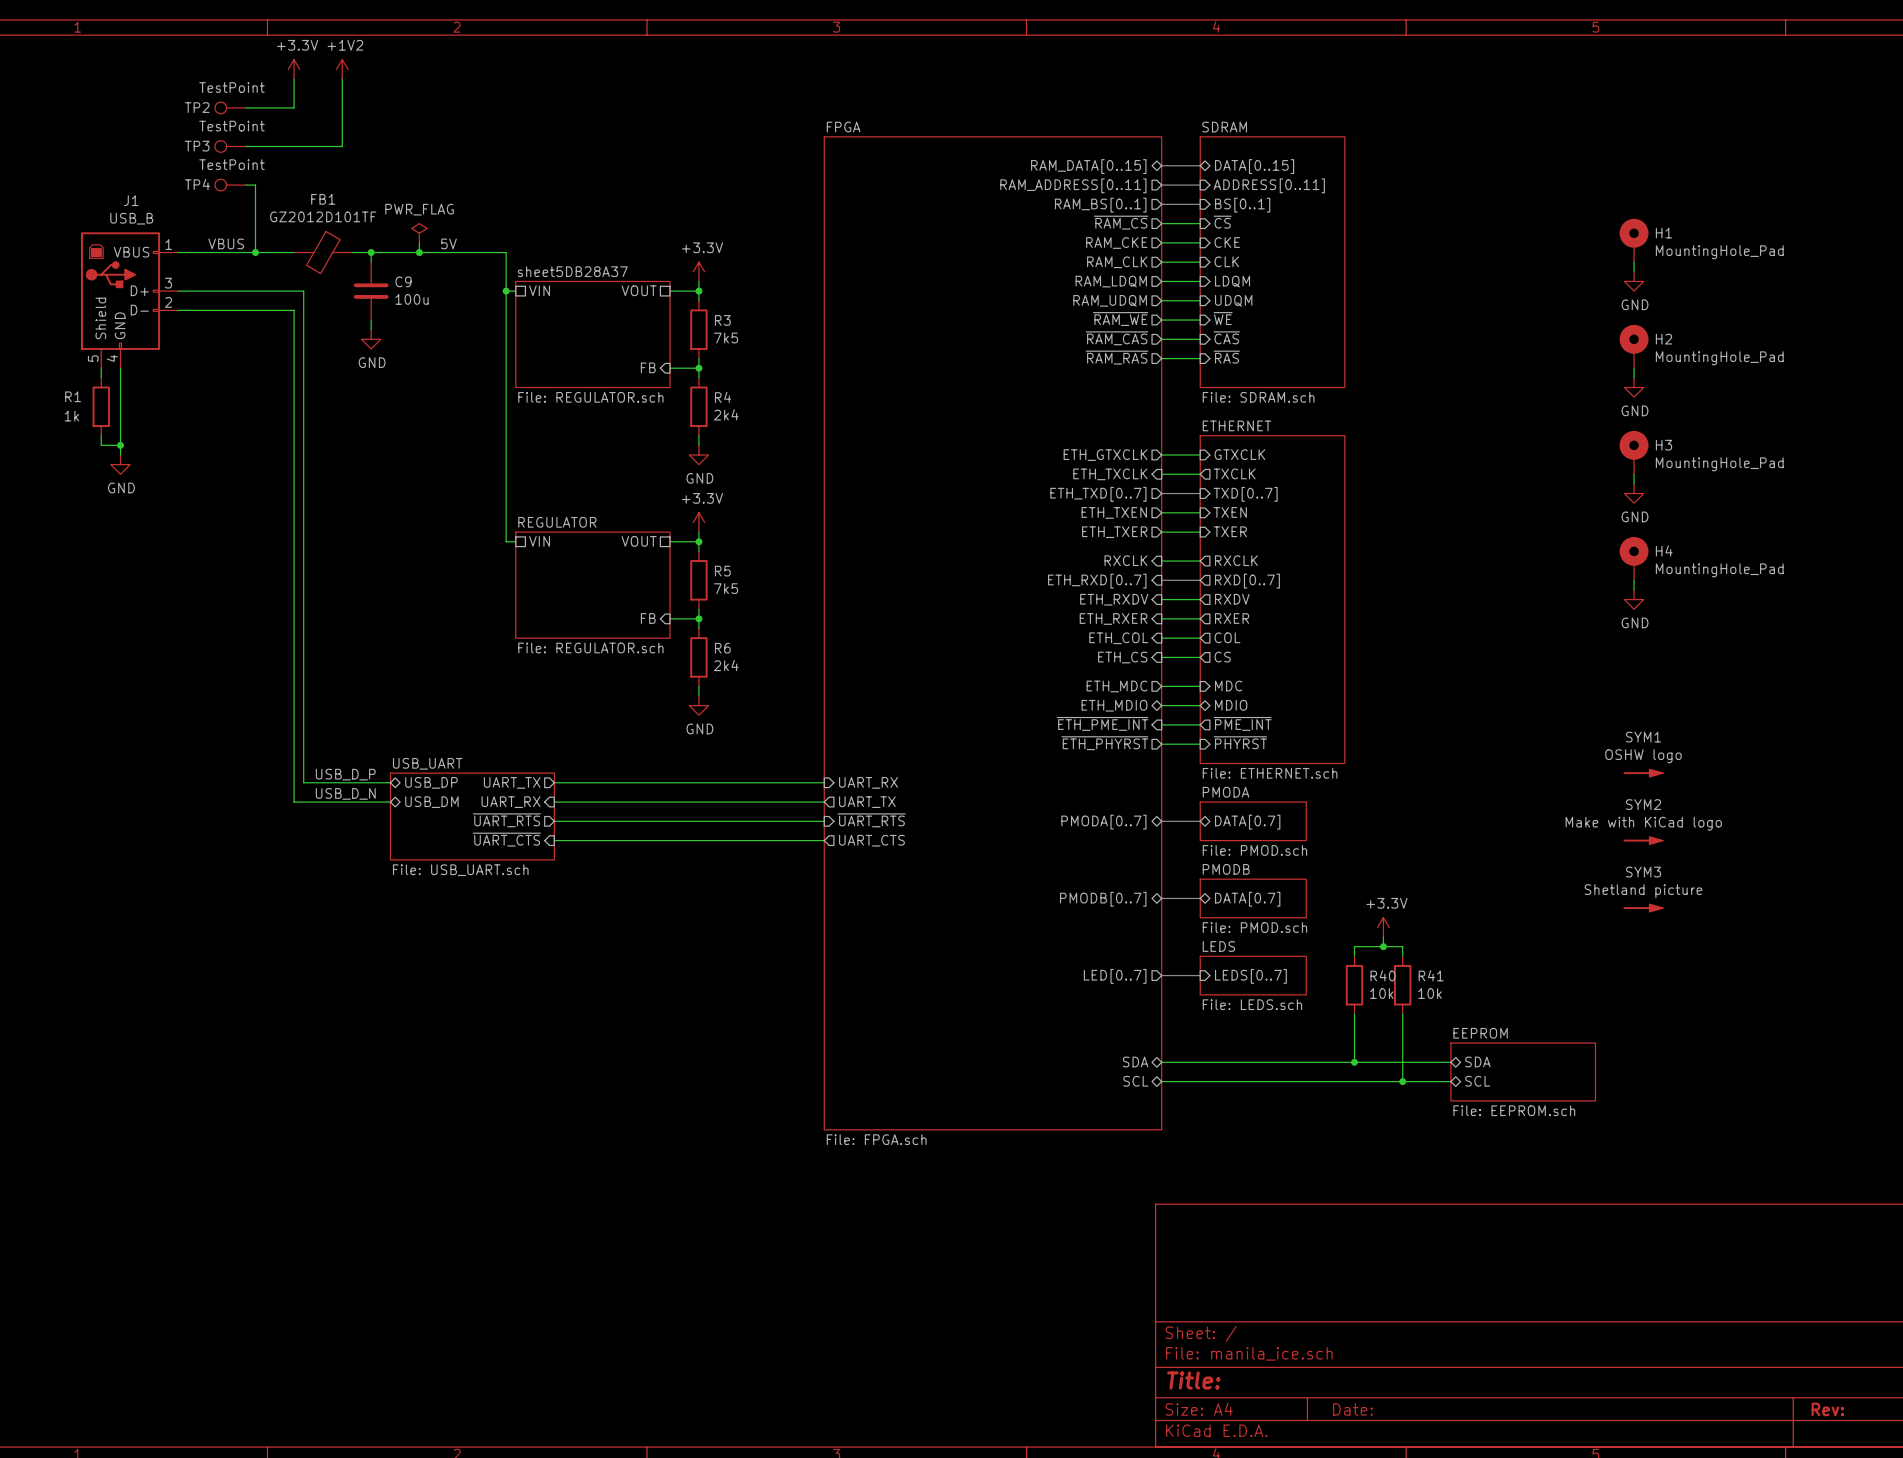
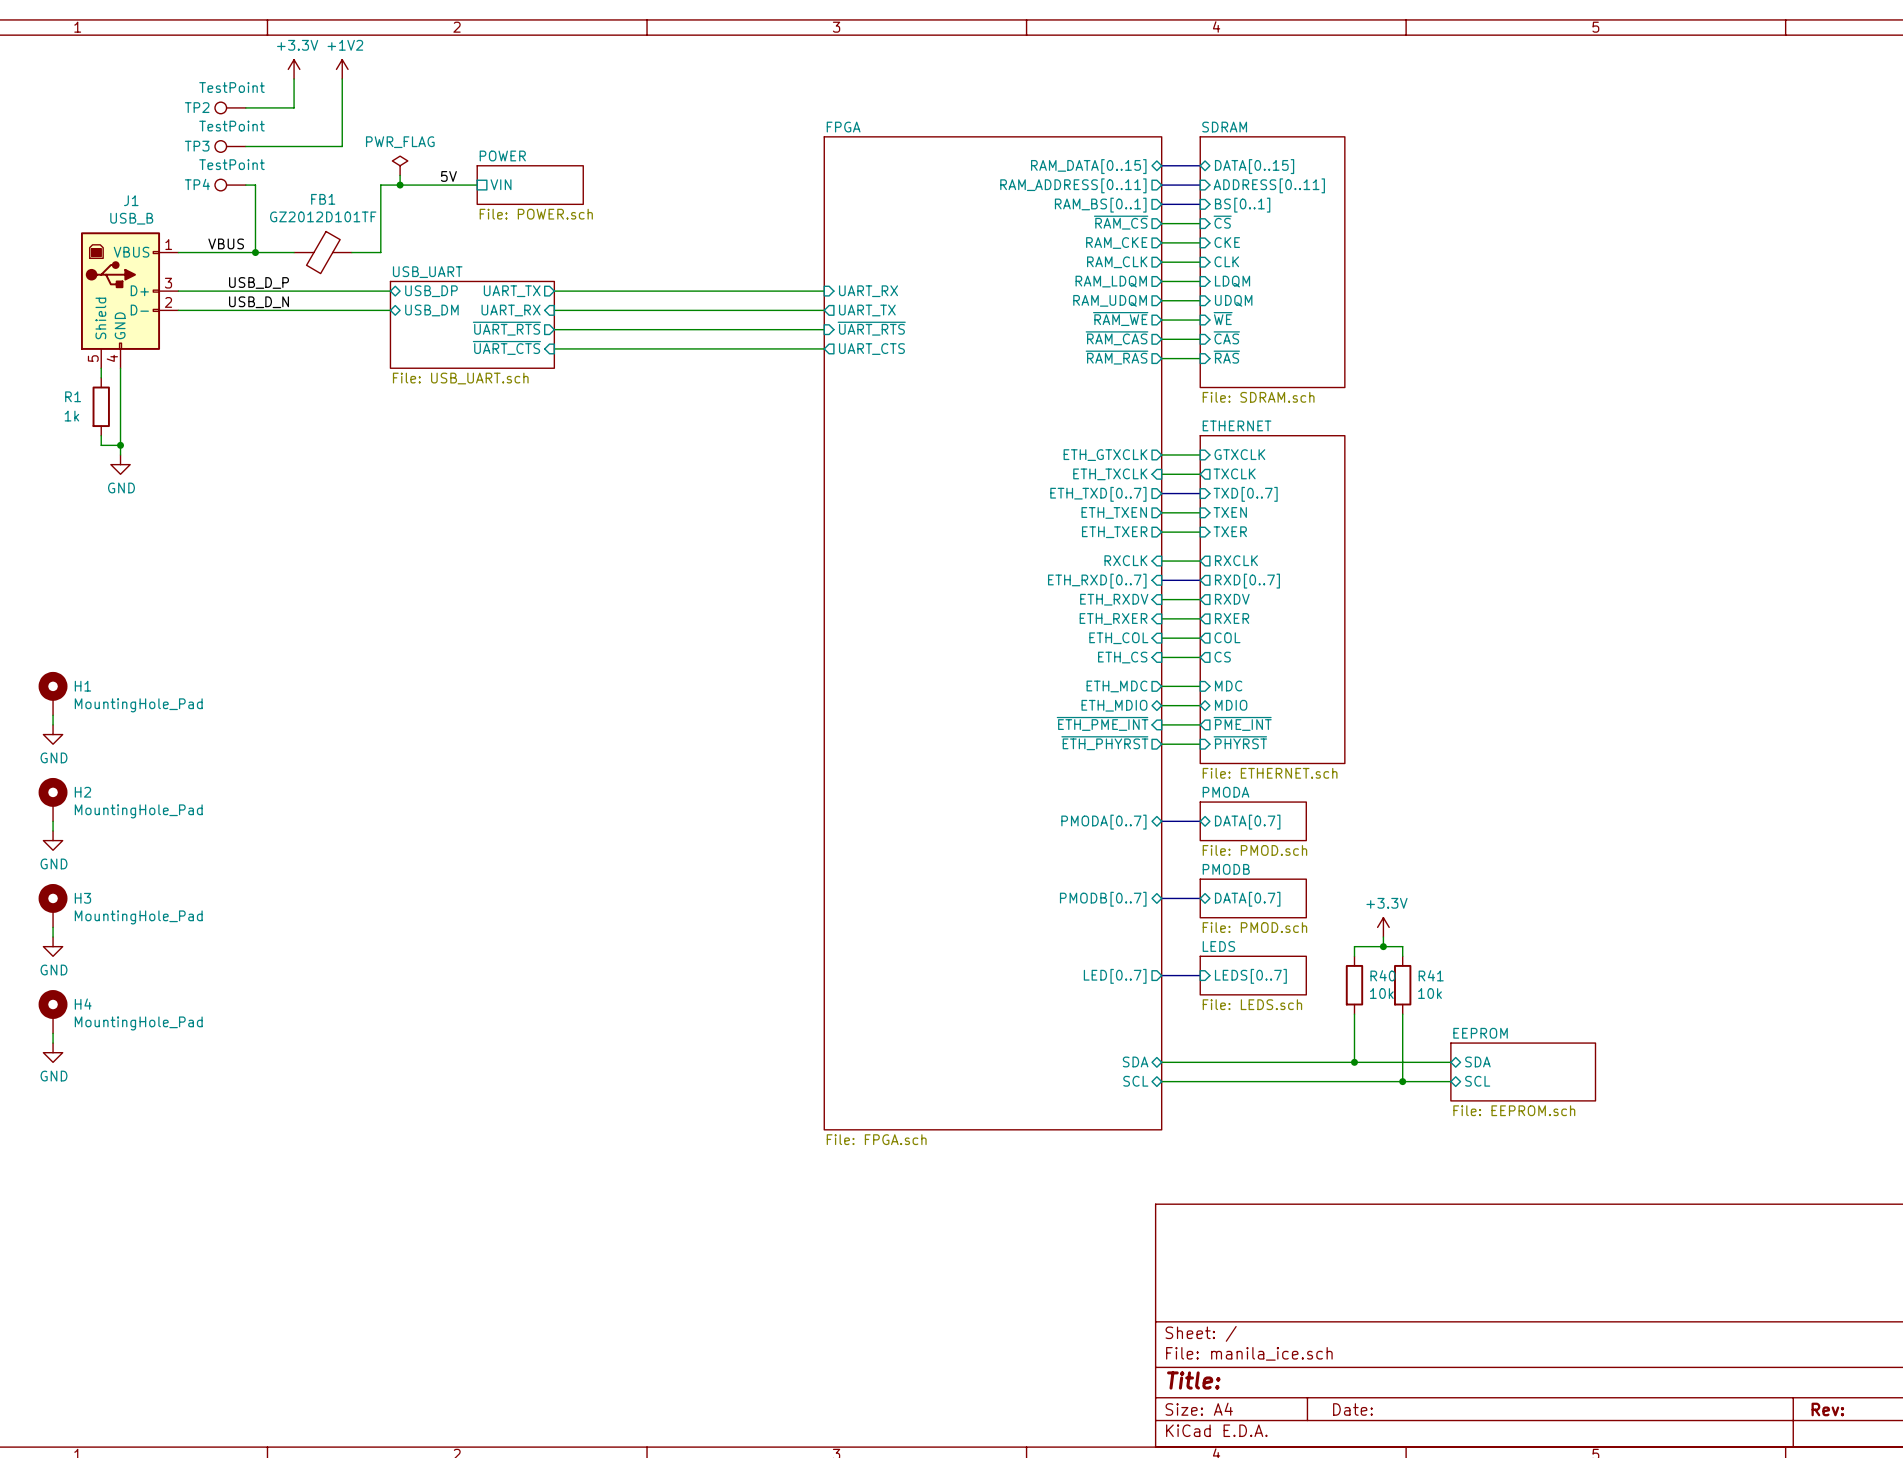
junction: none -> (400, 185)
sheet POWER: none -> File: POWER.sch (530, 185)
power symbol position: PWR_FLAG (419, 233) -> PWR_FLAG (400, 165)
H1 position: (1634, 240) -> (53, 693)
wire: (419, 242) (419, 252) -> (400, 175) (400, 185)
label position: 5V (448, 243) -> 5V (448, 176)
wire: (371, 252) (371, 262) -> none
junction: (371, 252) -> none
wire: (380, 252) (506, 252) (506, 541) (515, 541) -> (380, 252) (380, 185) (477, 185)
junction: (419, 252) -> none
wire: (1634, 262) (1634, 271) -> none
power symbol: +3.3V (698, 271) -> none
wire: (698, 281) (698, 300) -> none
power symbol: GND (1634, 281) -> none
label: none -> USB_D_P (259, 282)
sheet pin position: VIN (539, 290) -> VIN (501, 184)
sheet pin: VOUT (639, 290) -> none
wire: (303, 291) (303, 782) (390, 782) -> (303, 291) (390, 291)
C9: 100u (371, 291) -> none
sheet pin: none -> USB_DP (431, 291)
wire: (506, 291) (515, 291) -> none
junction: (506, 291) -> none
sheet pin: none -> UART_TX (512, 291)
wire: none -> (554, 291) (670, 291)
wire: none -> (698, 291) (824, 291)
junction: (698, 291) -> none
sheet pin: none -> UART_RX (868, 291)
label: none -> USB_D_N (259, 302)
wire: (294, 310) (294, 802) (390, 802) -> (294, 310) (390, 310)
sheet pin: none -> USB_DM (431, 310)
sheet pin: none -> UART_RX (511, 310)
wire: none -> (554, 310) (824, 310)
sheet pin: none -> UART_TX (867, 310)
wire: (371, 320) (371, 329) -> none
sheet USB_UART: none -> File: USB_UART.sch (472, 324)
sheet pin: none -> ~{UART_RTS} (506, 328)
sheet pin: none -> ~{UART_RTS} (871, 328)
wire: none -> (554, 329) (824, 329)
R3: 7k5 (698, 329) -> none
sheet sheet5DB28A37: File: REGULATOR.sch (592, 334) -> none
power symbol: GND (371, 339) -> none
H2 position: (1634, 346) -> (53, 799)
sheet pin: none -> ~{UART_CTS} (506, 347)
wire: none -> (554, 348) (824, 348)
sheet pin: none -> UART_CTS (871, 349)
wire: (698, 358) (698, 377) -> none
sheet pin: FB (648, 367) -> none
wire: (670, 368) (698, 368) -> none
junction: (698, 368) -> none
wire: (1634, 368) (1634, 377) -> none
power symbol: GND (1634, 387) -> none
R4: 2k4 (698, 406) -> none
wire: (698, 435) (698, 445) -> none
H3 position: (1634, 452) -> (53, 905)
power symbol: GND (698, 454) -> none
wire: (1634, 474) (1634, 483) -> none
power symbol: GND (1634, 493) -> none
power symbol: +3.3V (698, 522) -> none
wire: (698, 532) (698, 551) -> none
sheet pin: VIN (539, 541) -> none
sheet pin: VOUT (639, 541) -> none
wire: (670, 541) (698, 541) -> none
junction: (698, 541) -> none
H4 position: (1634, 558) -> (53, 1011)
R5: 7k5 (698, 580) -> none
wire: (1634, 580) (1634, 589) -> none
sheet REGULATOR: File: REGULATOR.sch (592, 585) -> none
power symbol: GND (1634, 599) -> none
wire: (698, 609) (698, 628) -> none
sheet pin: FB (648, 618) -> none
wire: (670, 618) (698, 618) -> none
junction: (698, 618) -> none
R6: 2k4 (698, 657) -> none
wire: (698, 686) (698, 696) -> none
power symbol: GND (698, 705) -> none
wire: none -> (53, 715) (53, 724)
power symbol: none -> GND (53, 734)
SYM1: OSHW logo (1643, 773) -> none
label: USB_D_P (345, 774) -> none
sheet pin: USB_DP (431, 782) -> none
sheet pin: UART_TX (512, 782) -> none
wire: (554, 782) (824, 782) -> none
sheet pin: UART_RX (868, 782) -> none
label: USB_D_N (345, 793) -> none
sheet pin: USB_DM (431, 802) -> none
sheet pin: UART_RX (511, 802) -> none
wire: (554, 802) (824, 802) -> none
sheet pin: UART_TX (867, 802) -> none
sheet USB_UART: File: USB_UART.sch (472, 816) -> none
sheet pin: ~{UART_RTS} (506, 820) -> none
sheet pin: ~{UART_RTS} (871, 820) -> none
wire: none -> (53, 821) (53, 830)
wire: (554, 821) (824, 821) -> none
sheet pin: ~{UART_CTS} (506, 839) -> none
power symbol: none -> GND (53, 840)
wire: (554, 840) (824, 840) -> none
sheet pin: UART_CTS (871, 840) -> none
SYM2: Make with KiCad logo (1643, 840) -> none
SYM3: Shetland picture (1643, 908) -> none
wire: none -> (53, 927) (53, 937)
power symbol: none -> GND (53, 946)
wire: none -> (53, 1033) (53, 1043)
power symbol: none -> GND (53, 1052)

